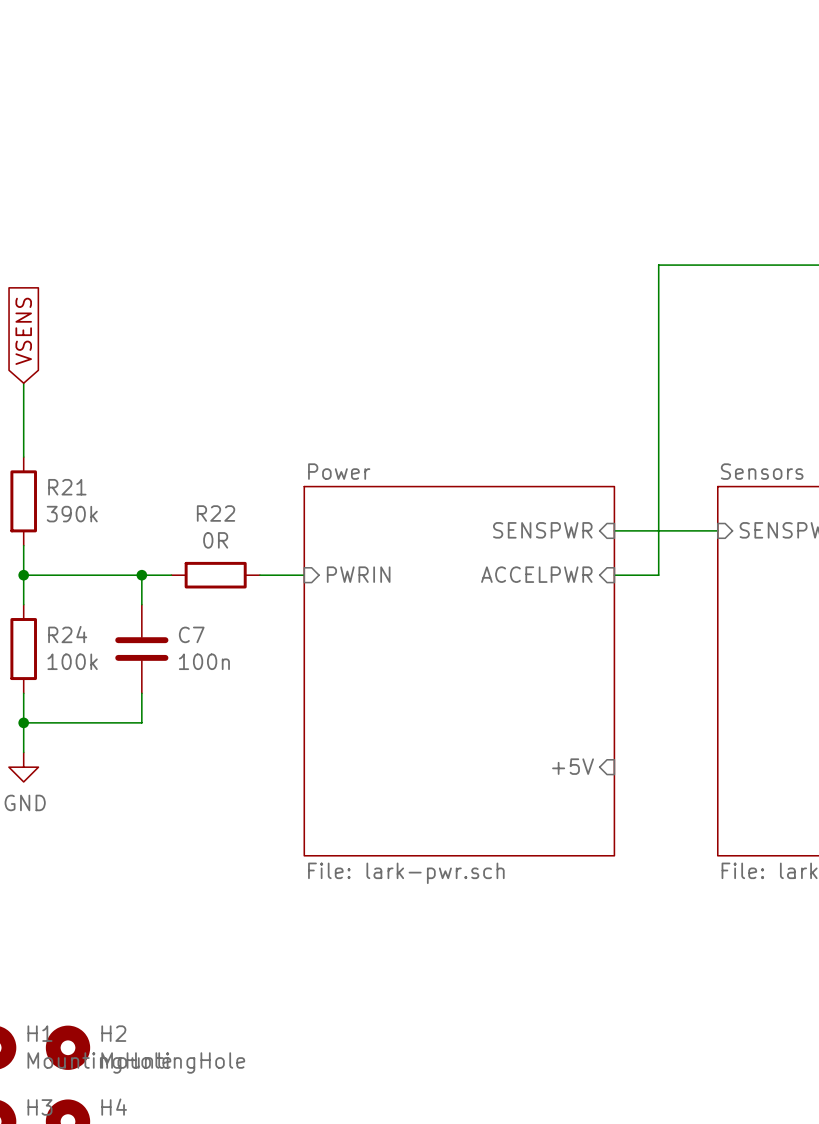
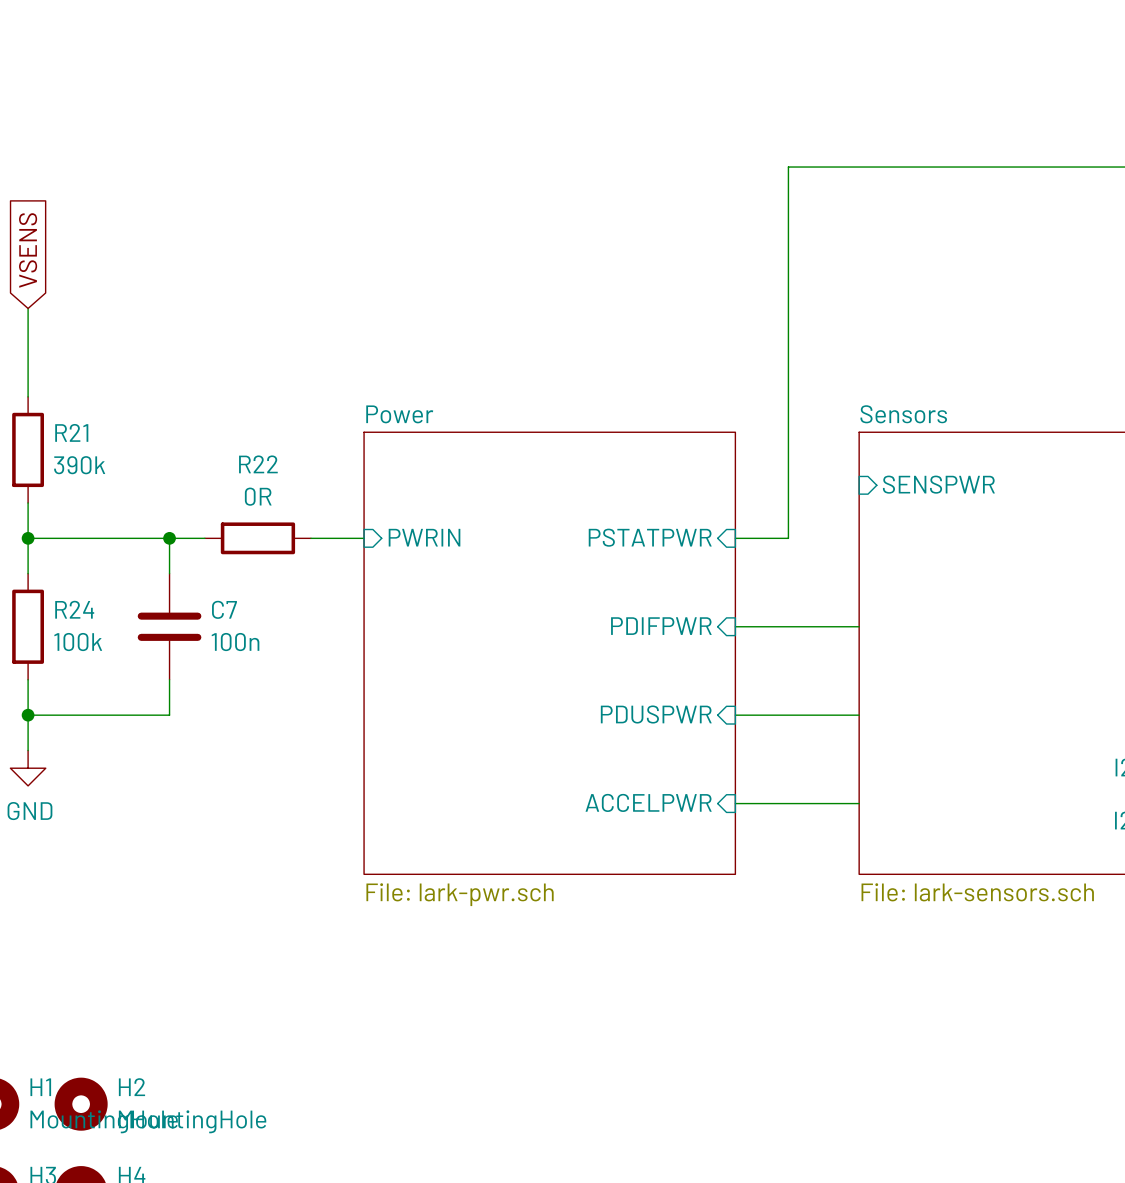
sheet pin: SENSPWR (542, 530) -> none
wire: (614, 530) (717, 530) -> (735, 626) (859, 626)
sheet pin: ACCELPWR (536, 574) -> PSTATPWR (650, 537)
sheet pin: none -> PDIFPWR (661, 626)
sheet pin: none -> PDUSPWR (656, 714)
wire: none -> (735, 715) (859, 715)
sheet pin: +5V (573, 766) -> none
sheet pin: none -> ACCELPWR (648, 802)
wire: none -> (735, 803) (859, 803)

